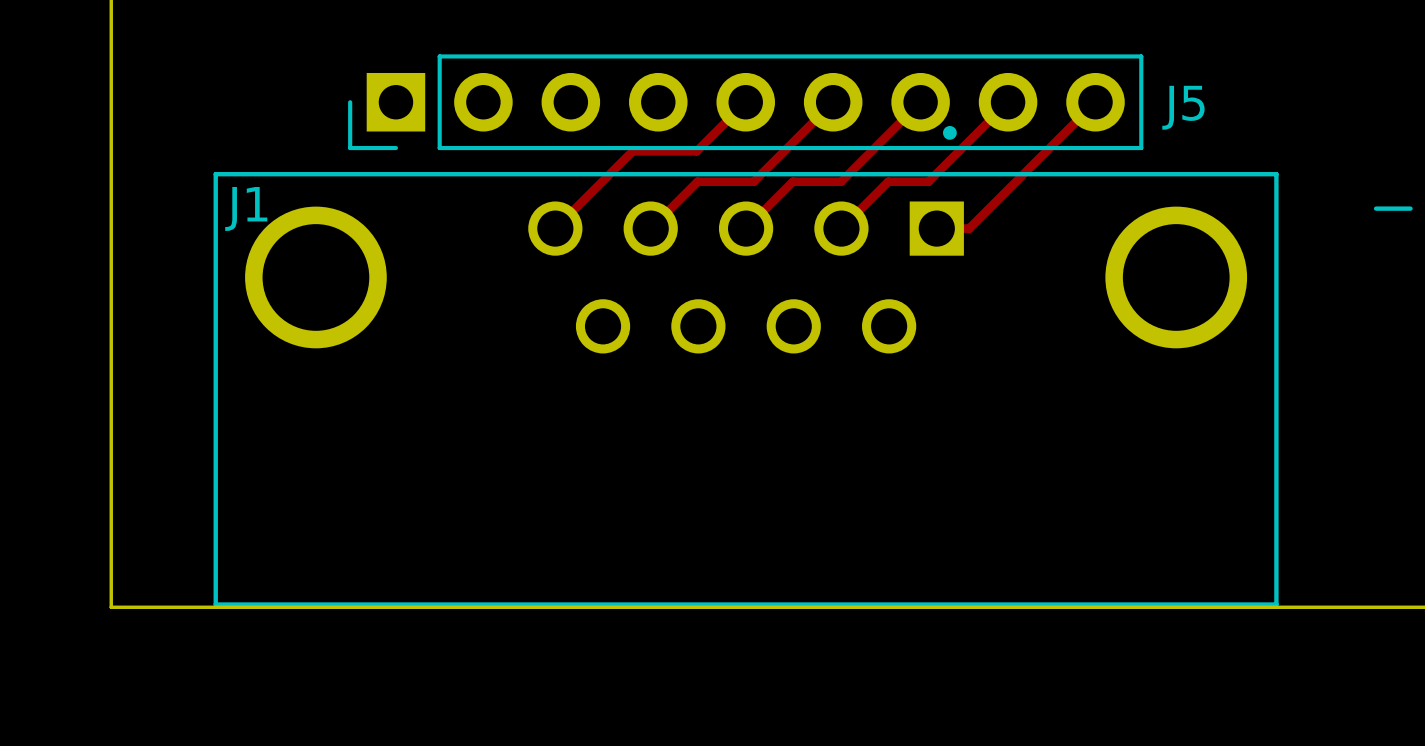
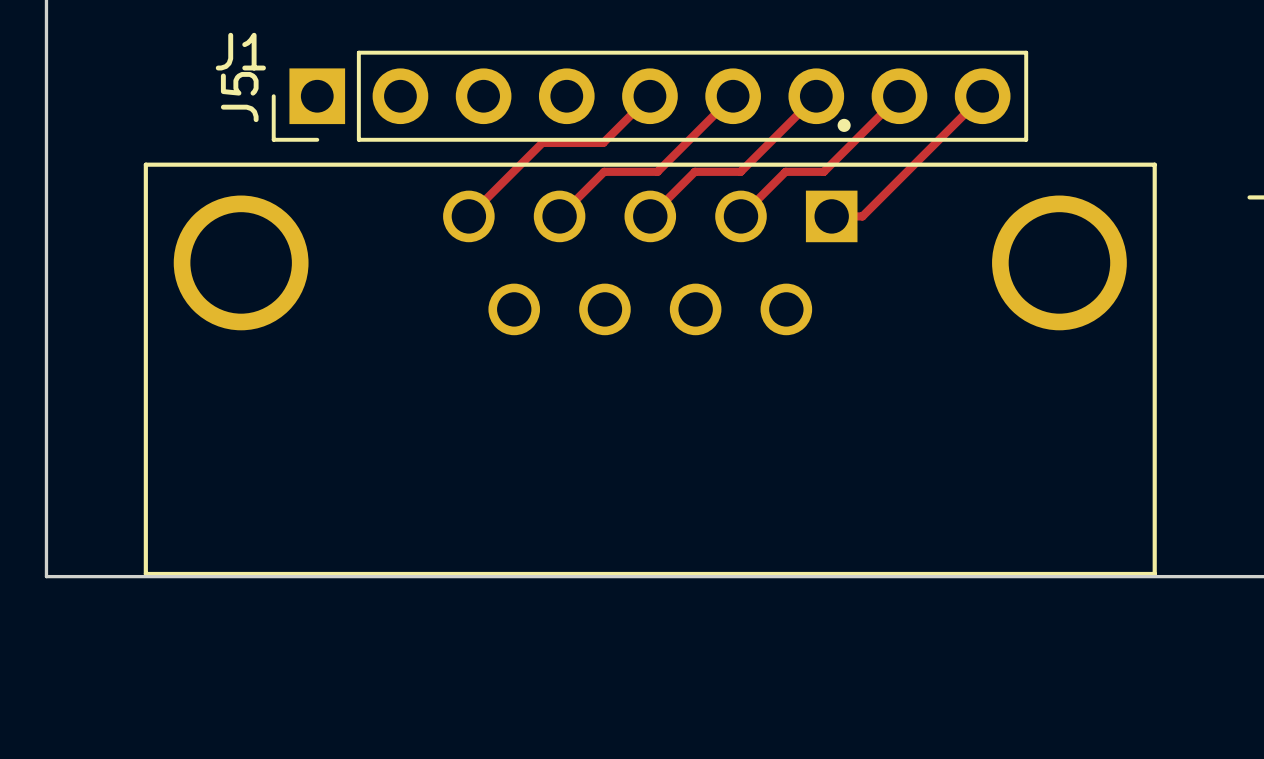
J5 name rotation: 0° (1183, 107) -> 90° counterclockwise (239, 97)
J5 name position: J5 (1183, 107) -> J5 (239, 97)
J1 name position: J1 (246, 208) -> J1 (240, 51)

